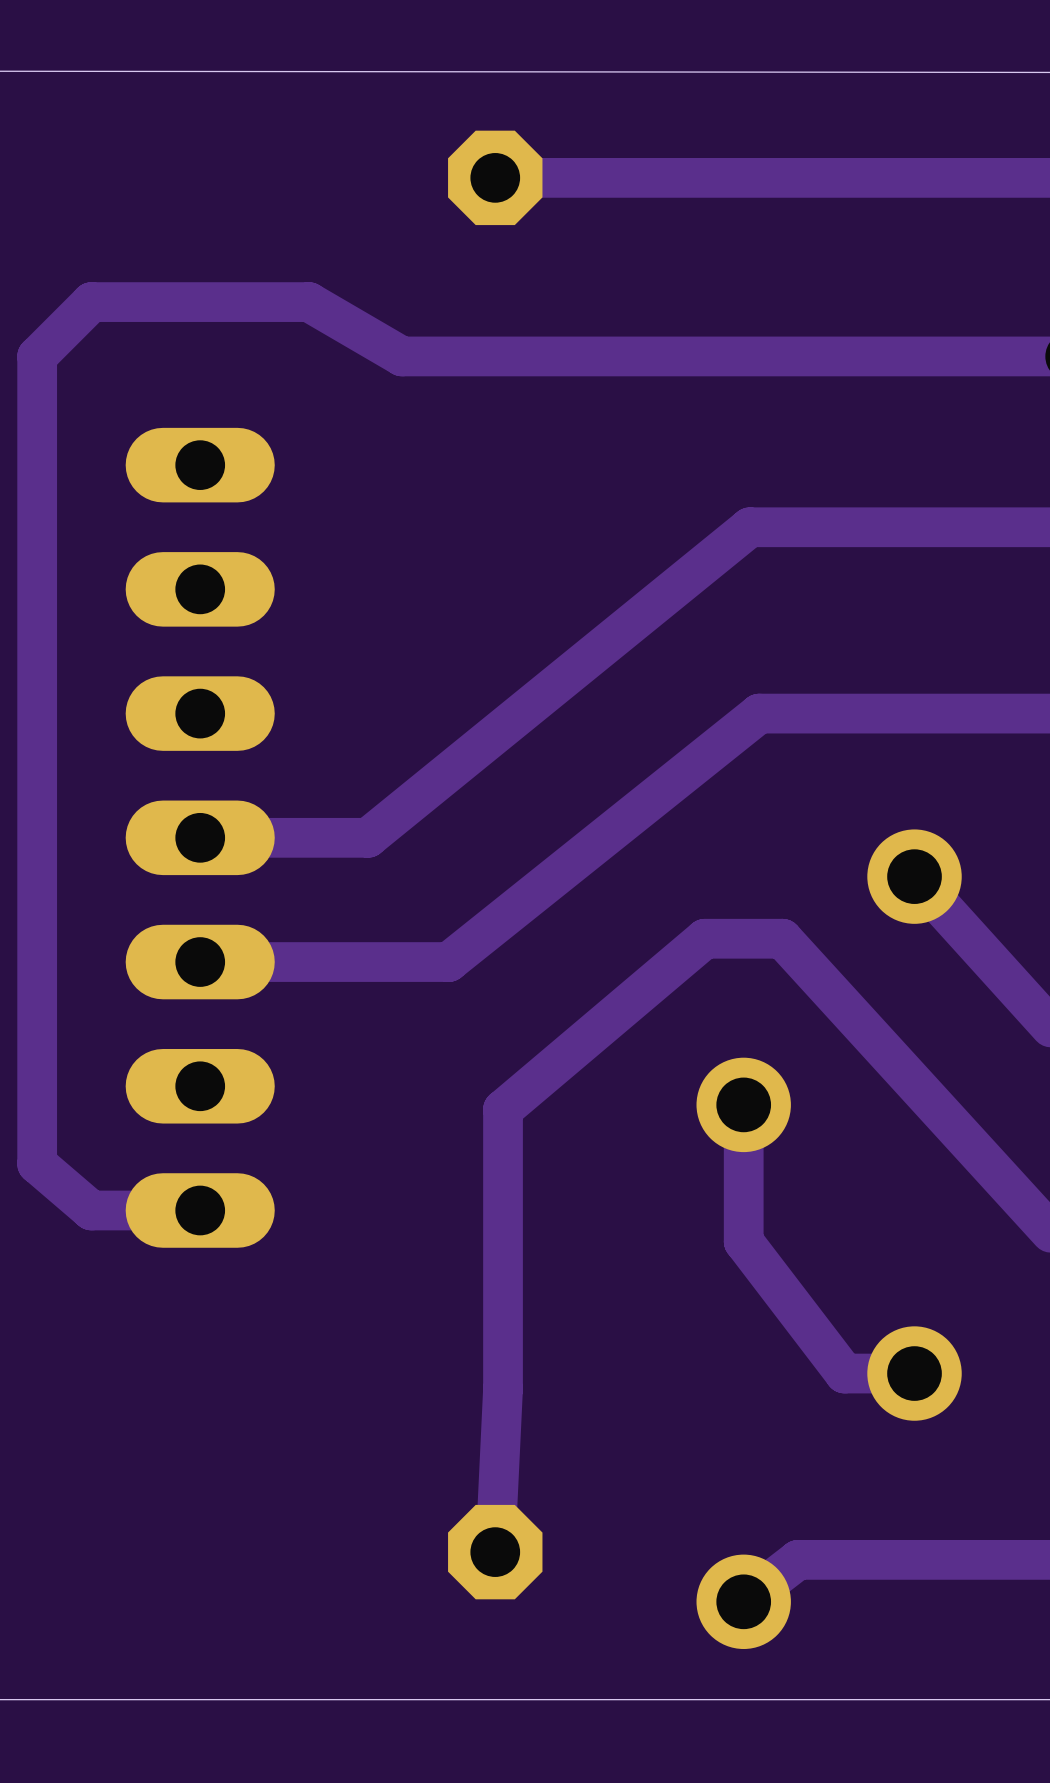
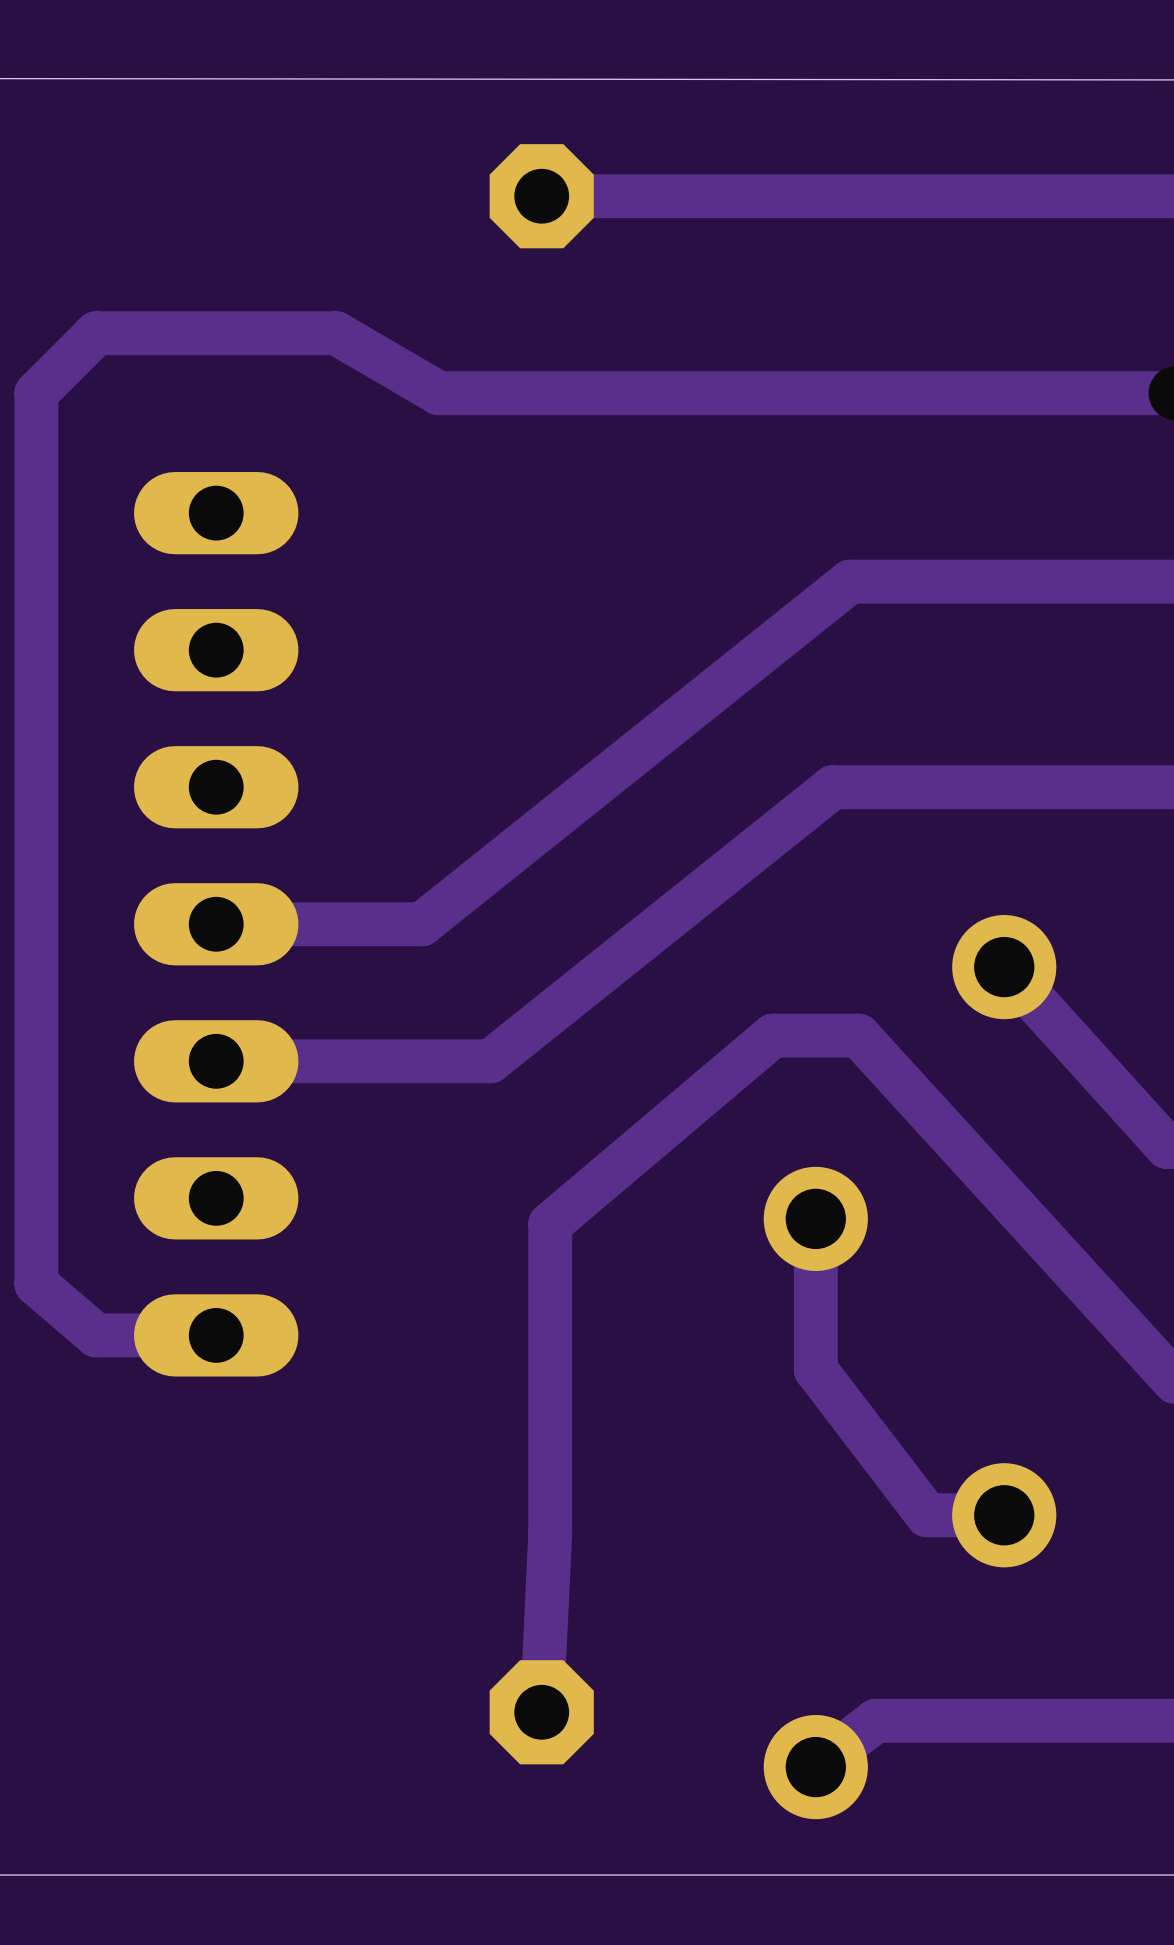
track: (774, 527) (749, 527) (367, 837) -> (850, 581) (421, 924) (401, 924)

